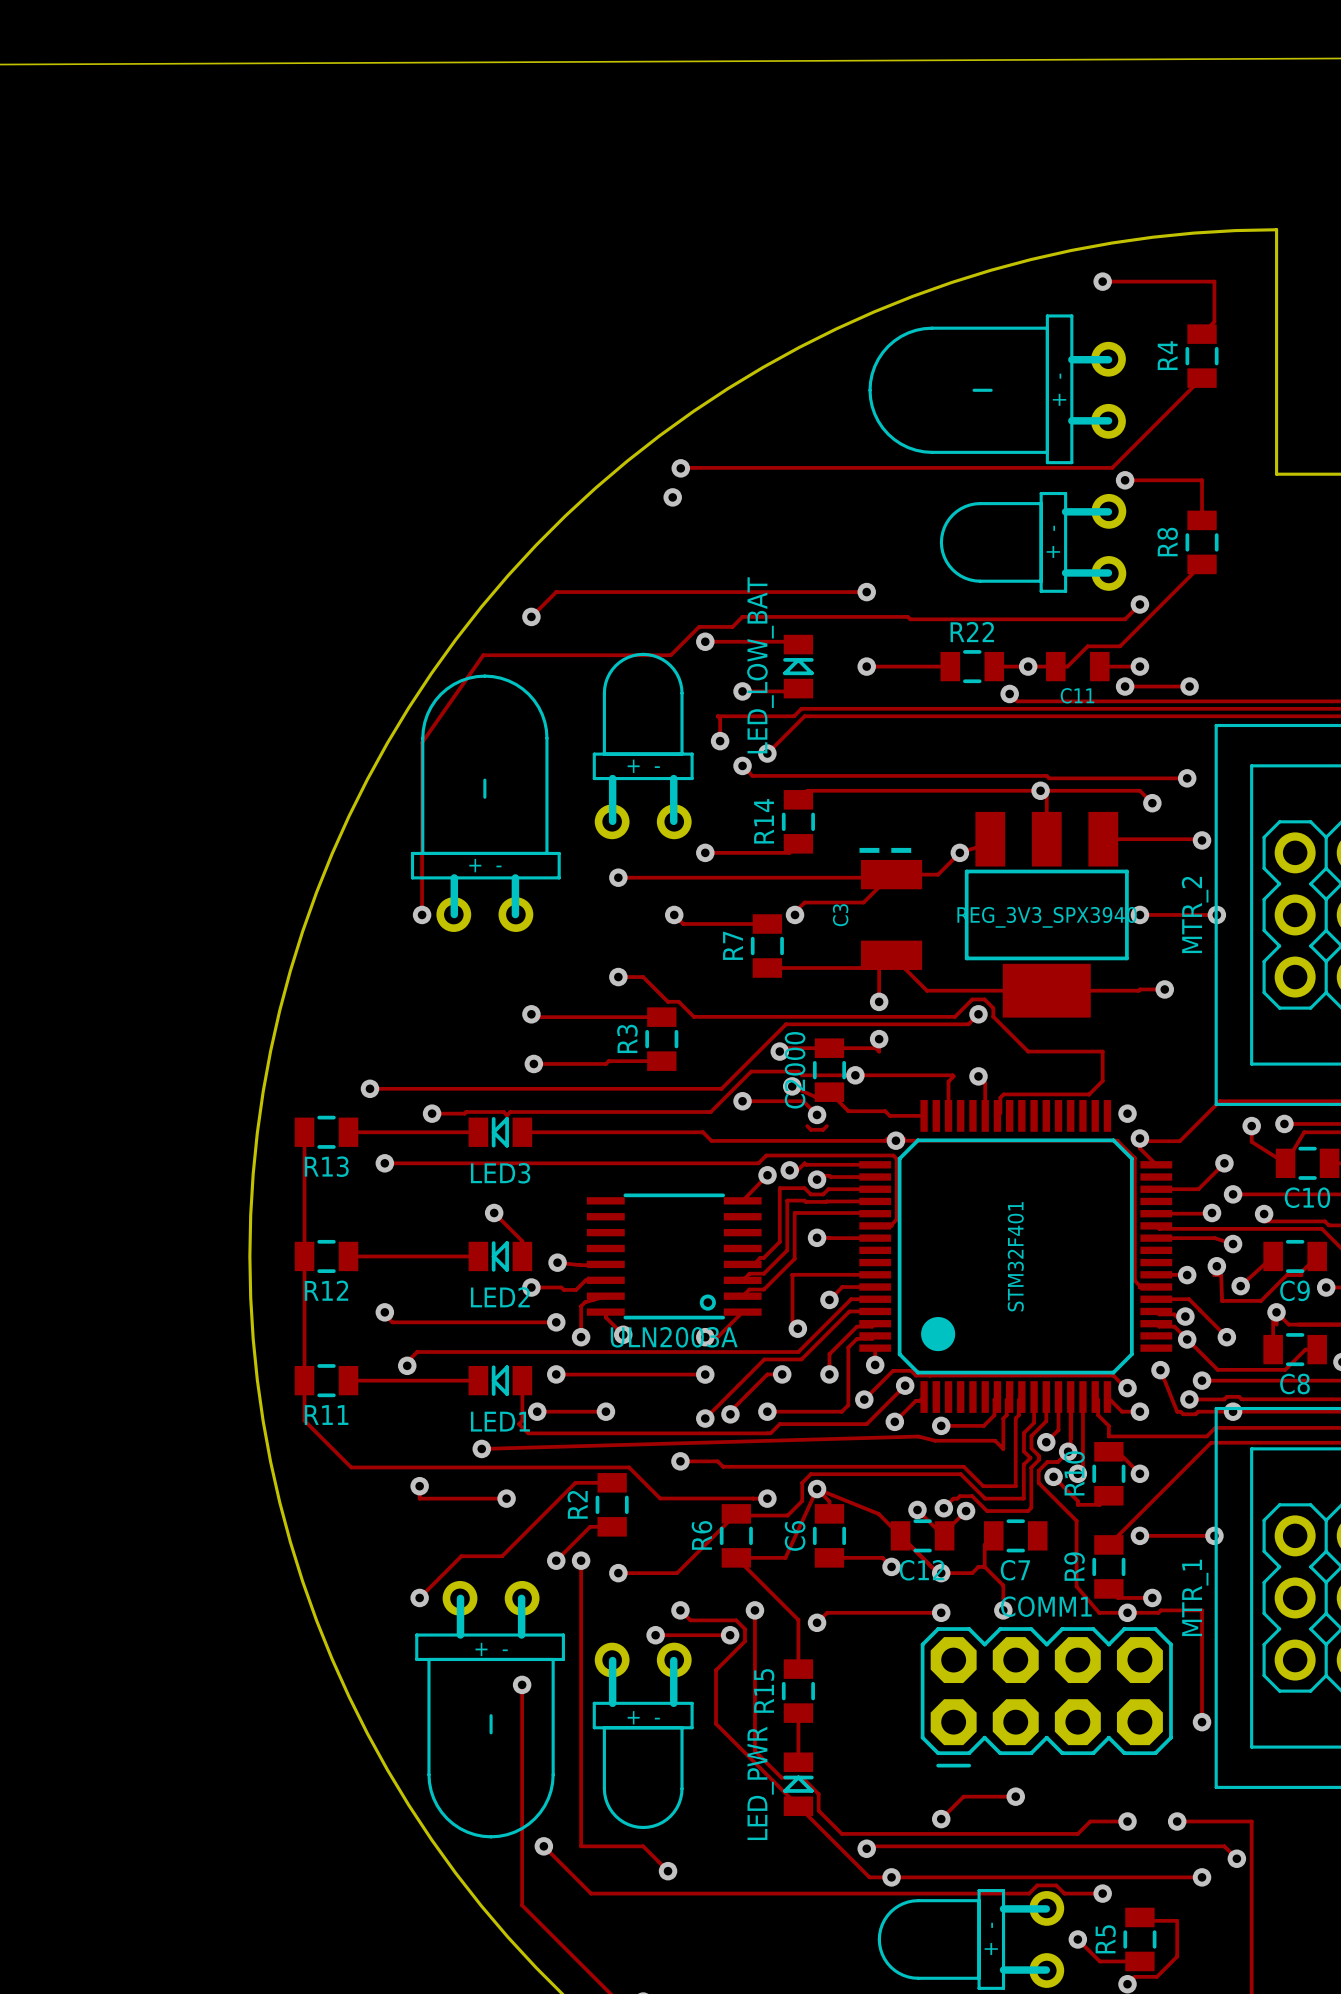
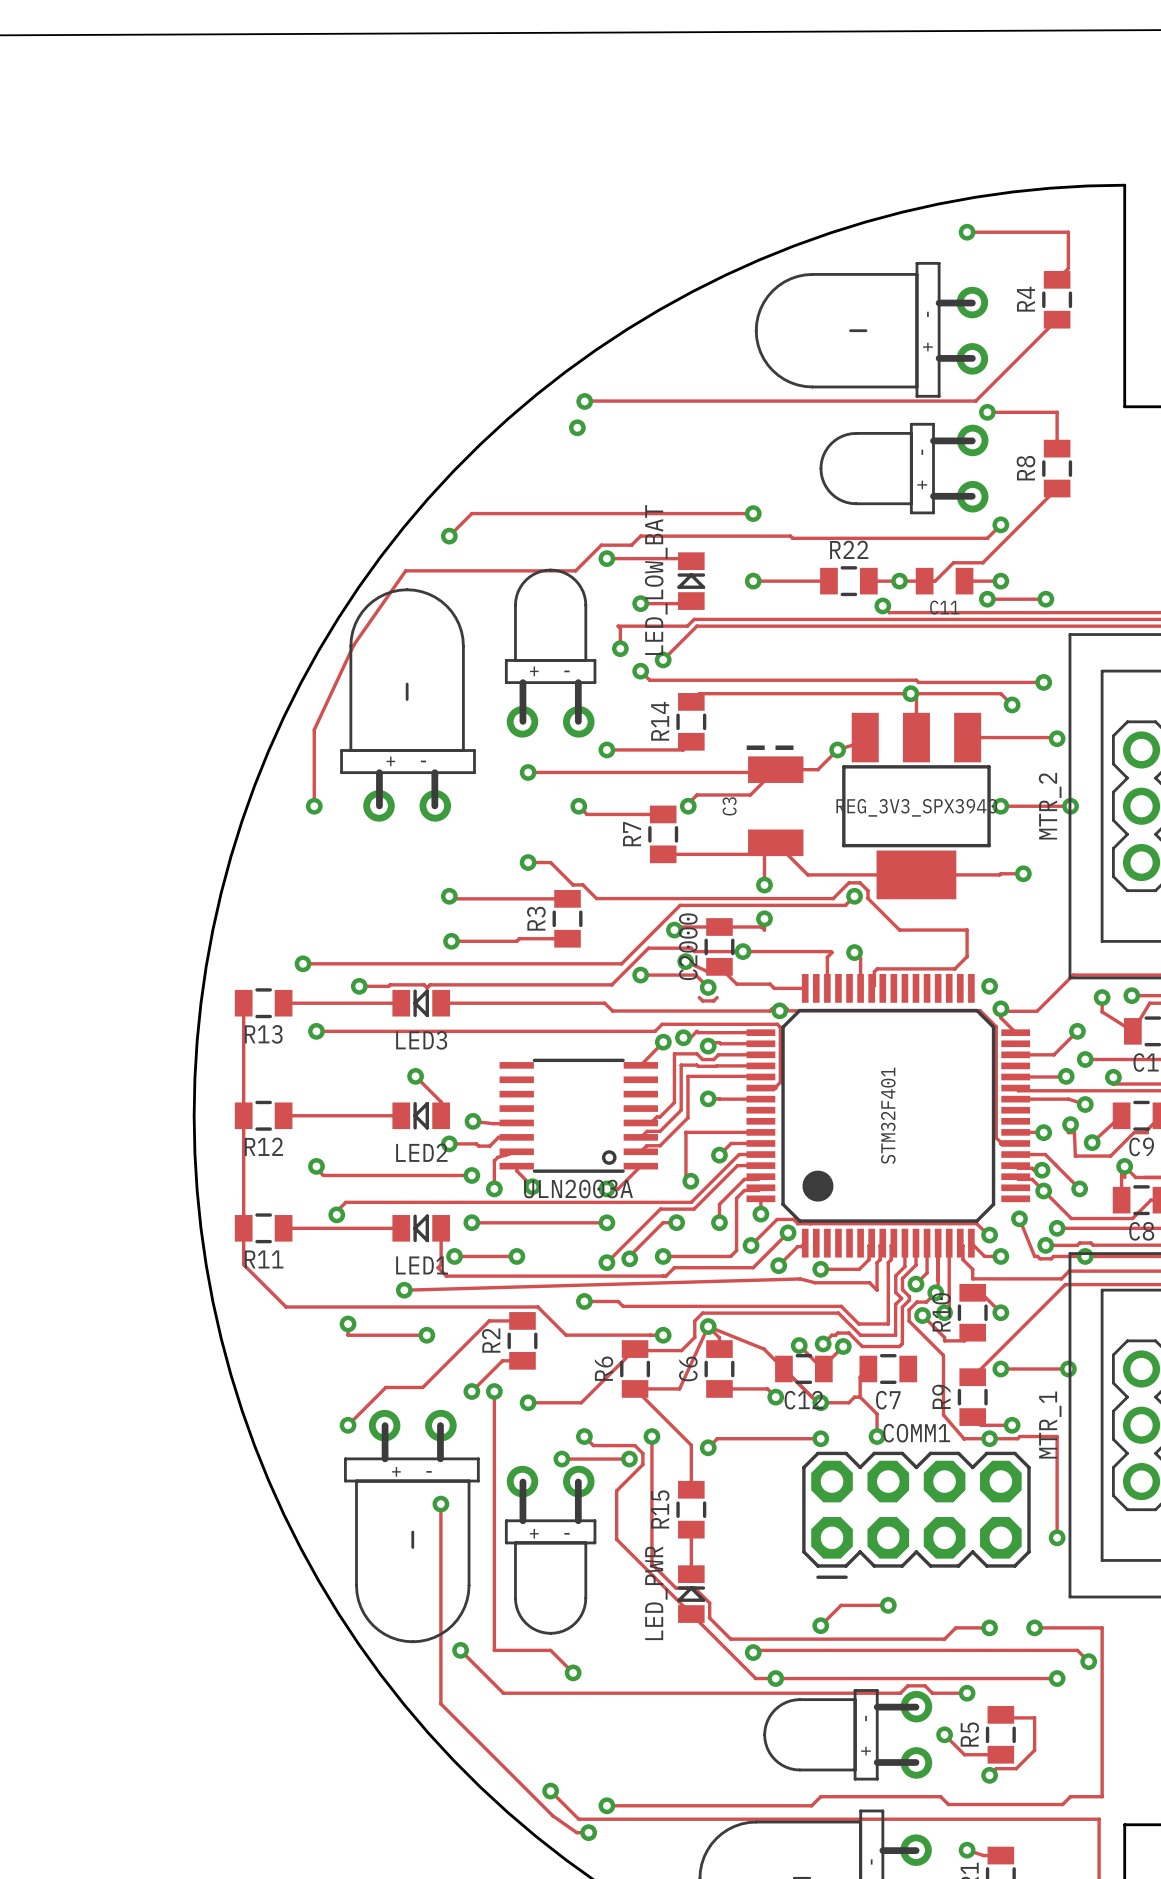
track: (426, 736) (422, 742) (422, 914) -> (353, 644) (314, 729) (314, 806)
via position: (422, 914) -> (314, 806)

